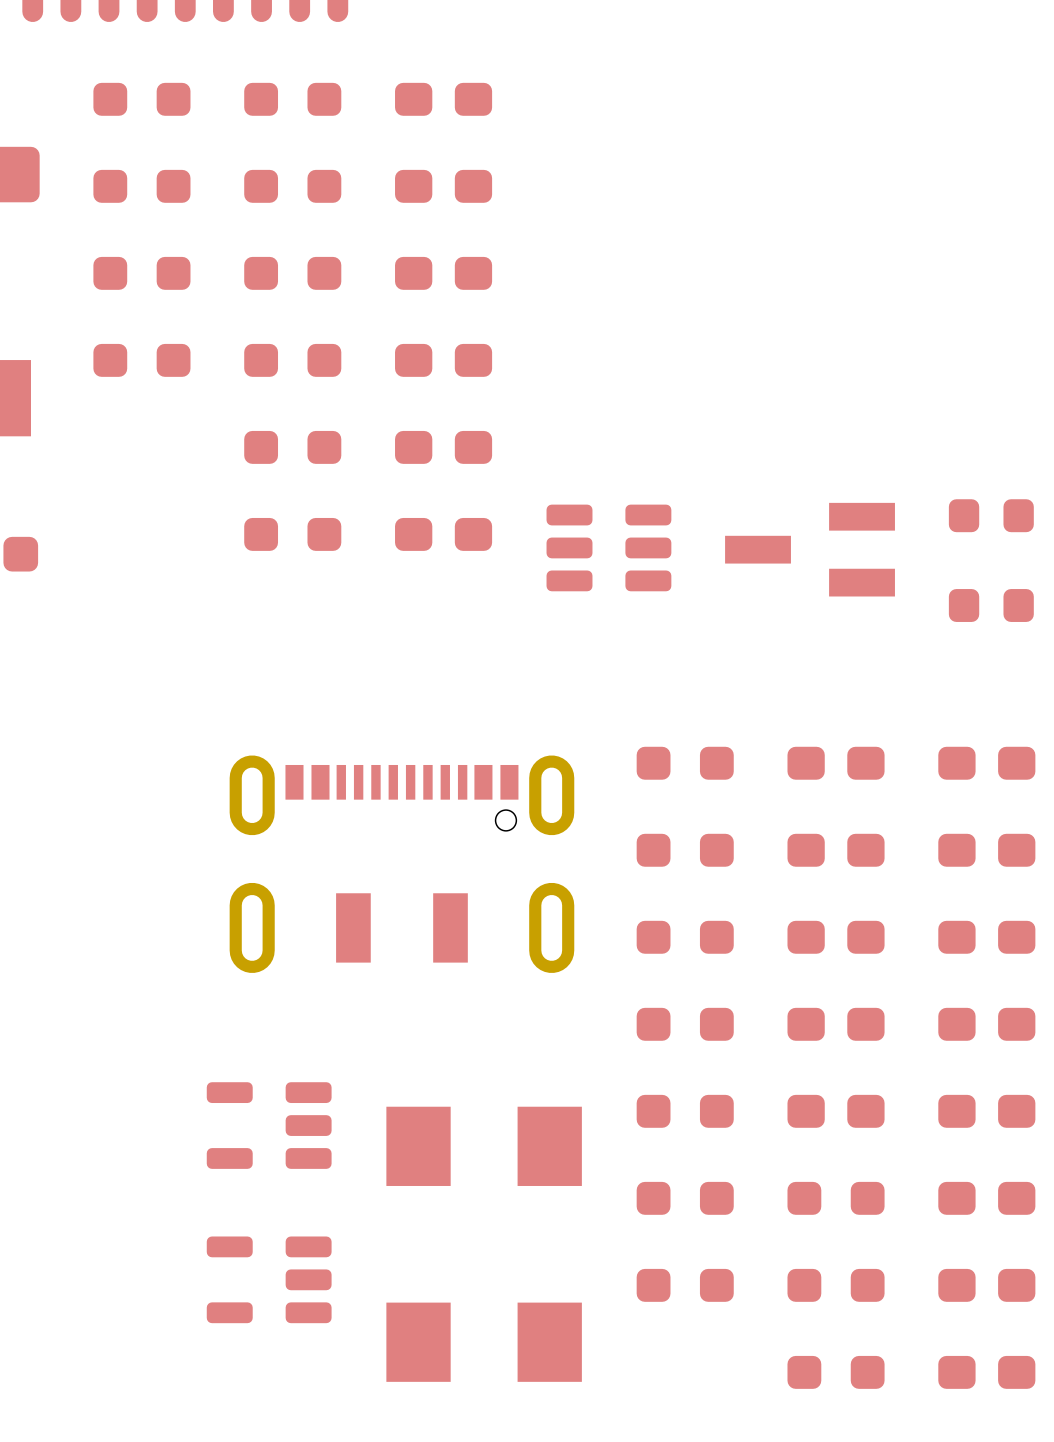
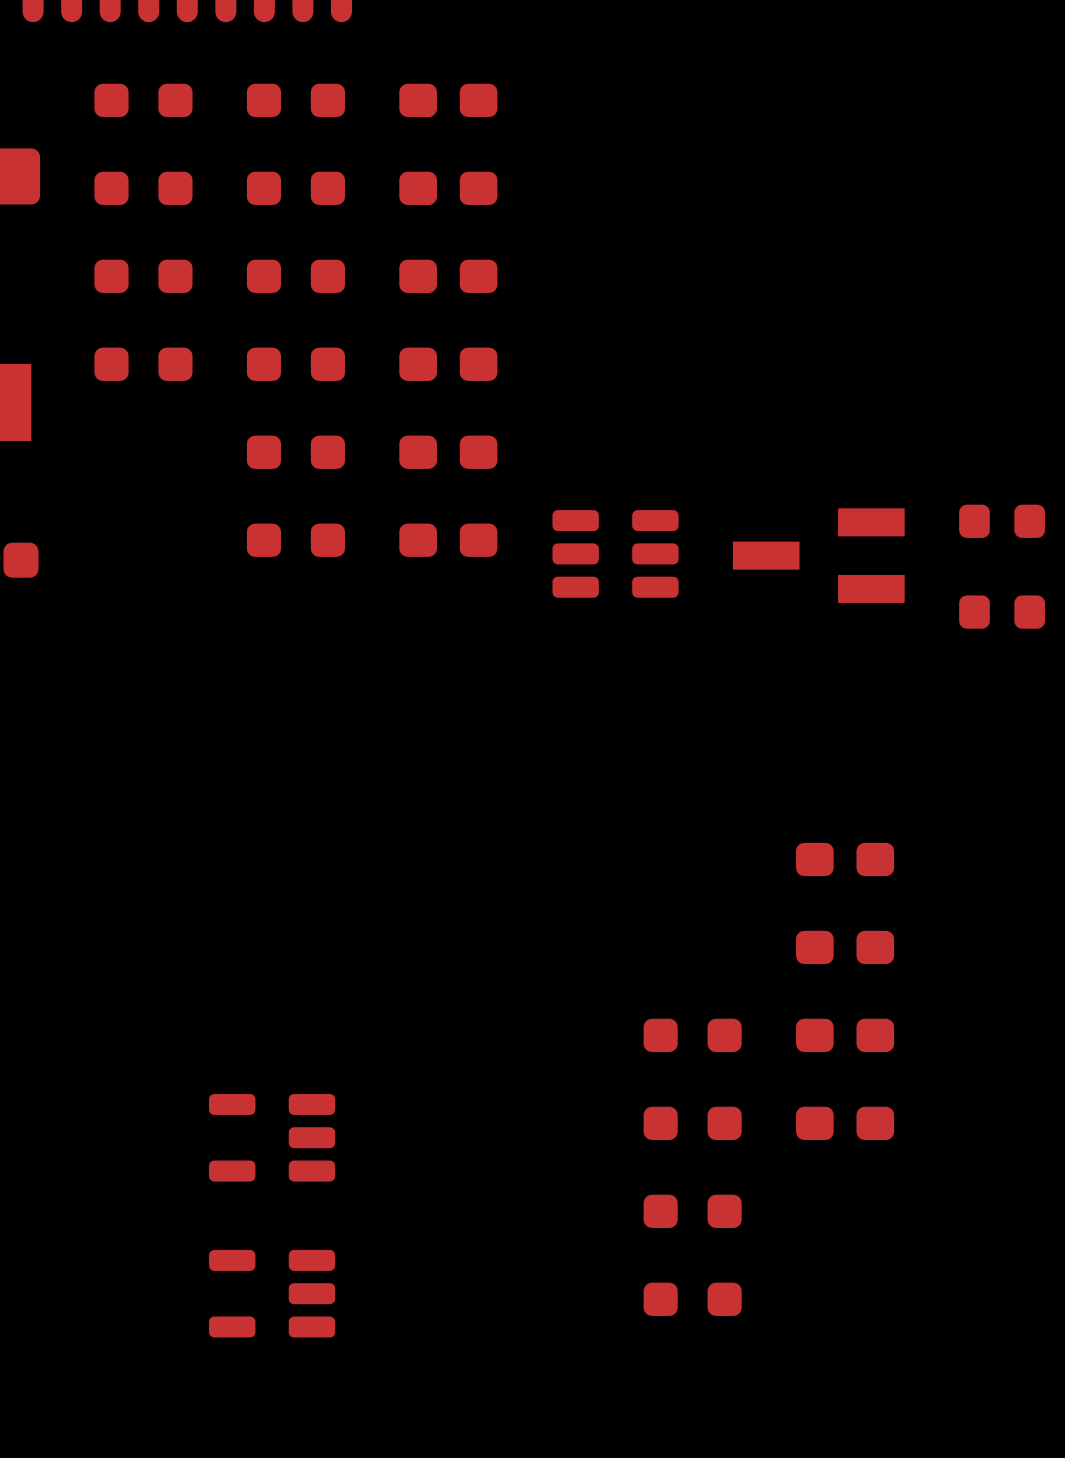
part: (685, 763) -> none
part: (836, 763) -> none
part: (986, 763) -> none
part: (685, 850) -> none
part: (986, 850) -> none
part: (401, 864) -> none
part: (685, 937) -> none
part: (986, 937) -> none
part: (986, 1024) -> none
part: (986, 1111) -> none
part: (484, 1146) -> none
part: (836, 1198) -> none
part: (986, 1198) -> none
part: (836, 1285) -> none
part: (986, 1285) -> none
part: (484, 1342) -> none
part: (836, 1372) -> none
part: (986, 1372) -> none

